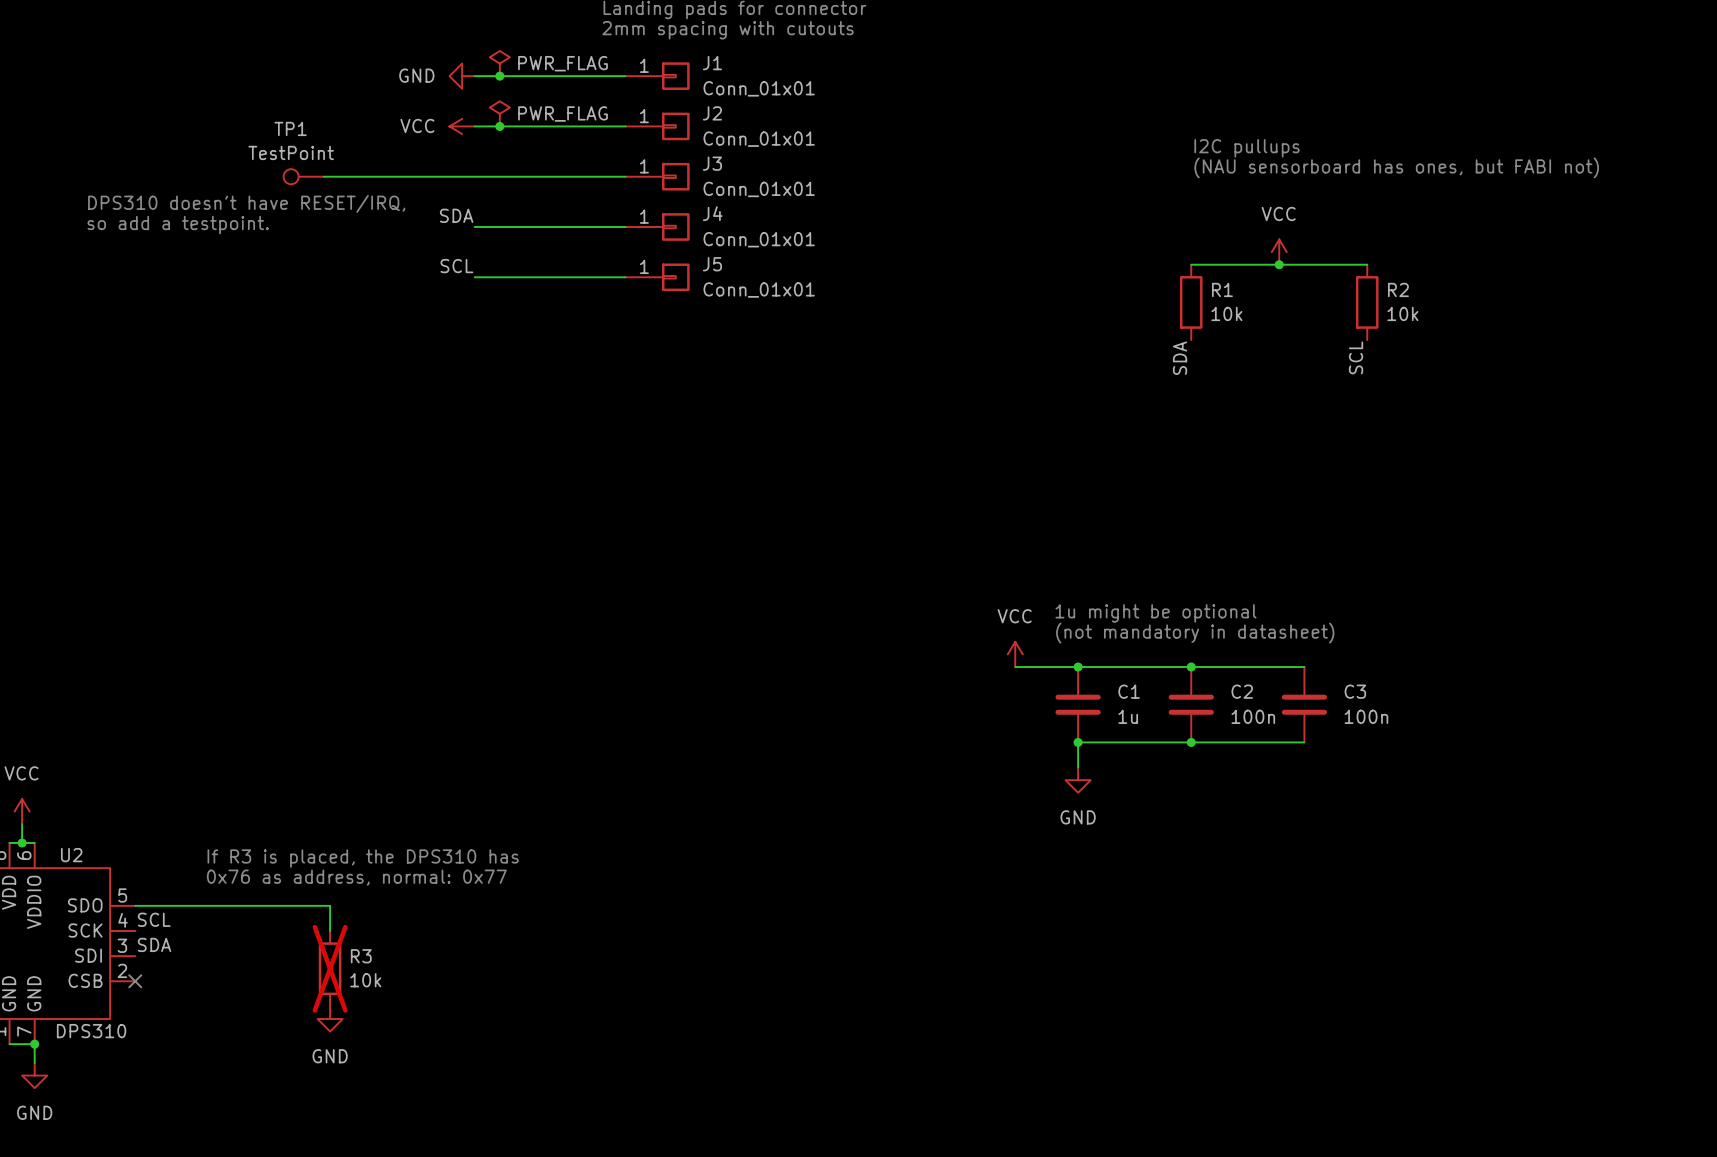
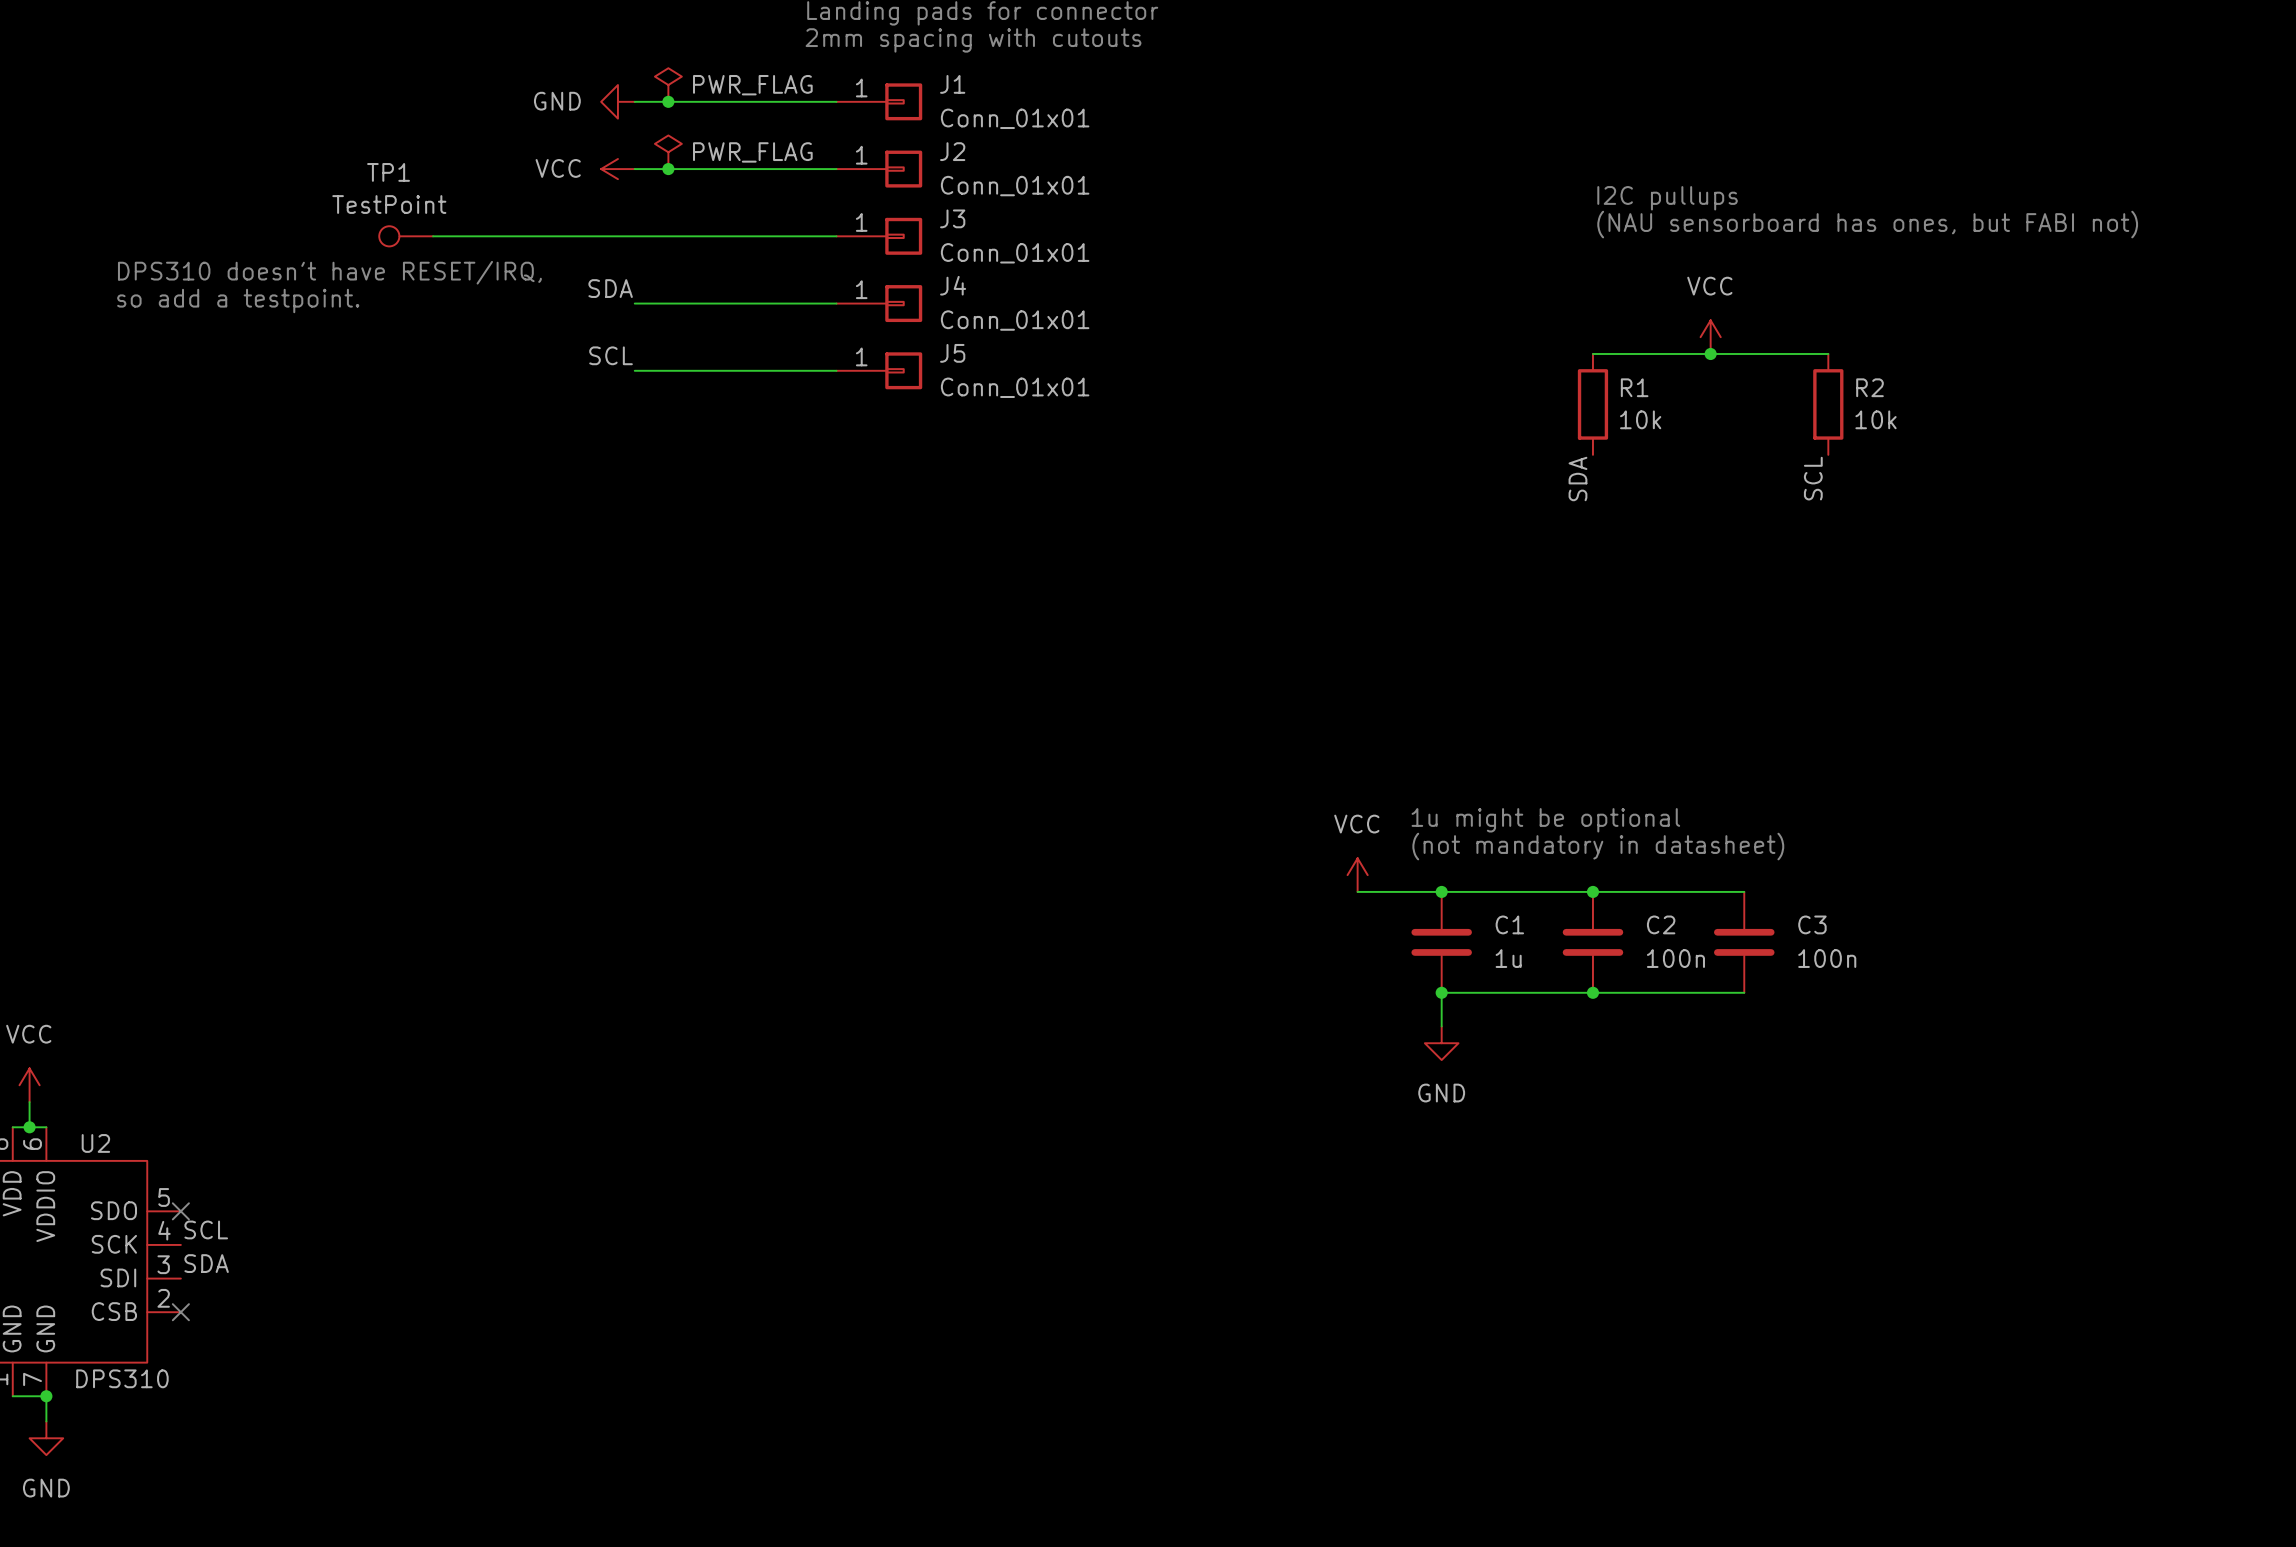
text: If R3 is placed, the DPS310 has (363, 858) -> none
text: 0x76 as address, normal: 0x77 (356, 877) -> none
wire: (135, 905) (330, 905) (330, 931) -> none
no-connect mark: none -> (180, 1211)
R3: 10k (330, 968) -> none
power symbol: GND (330, 1019) -> none

